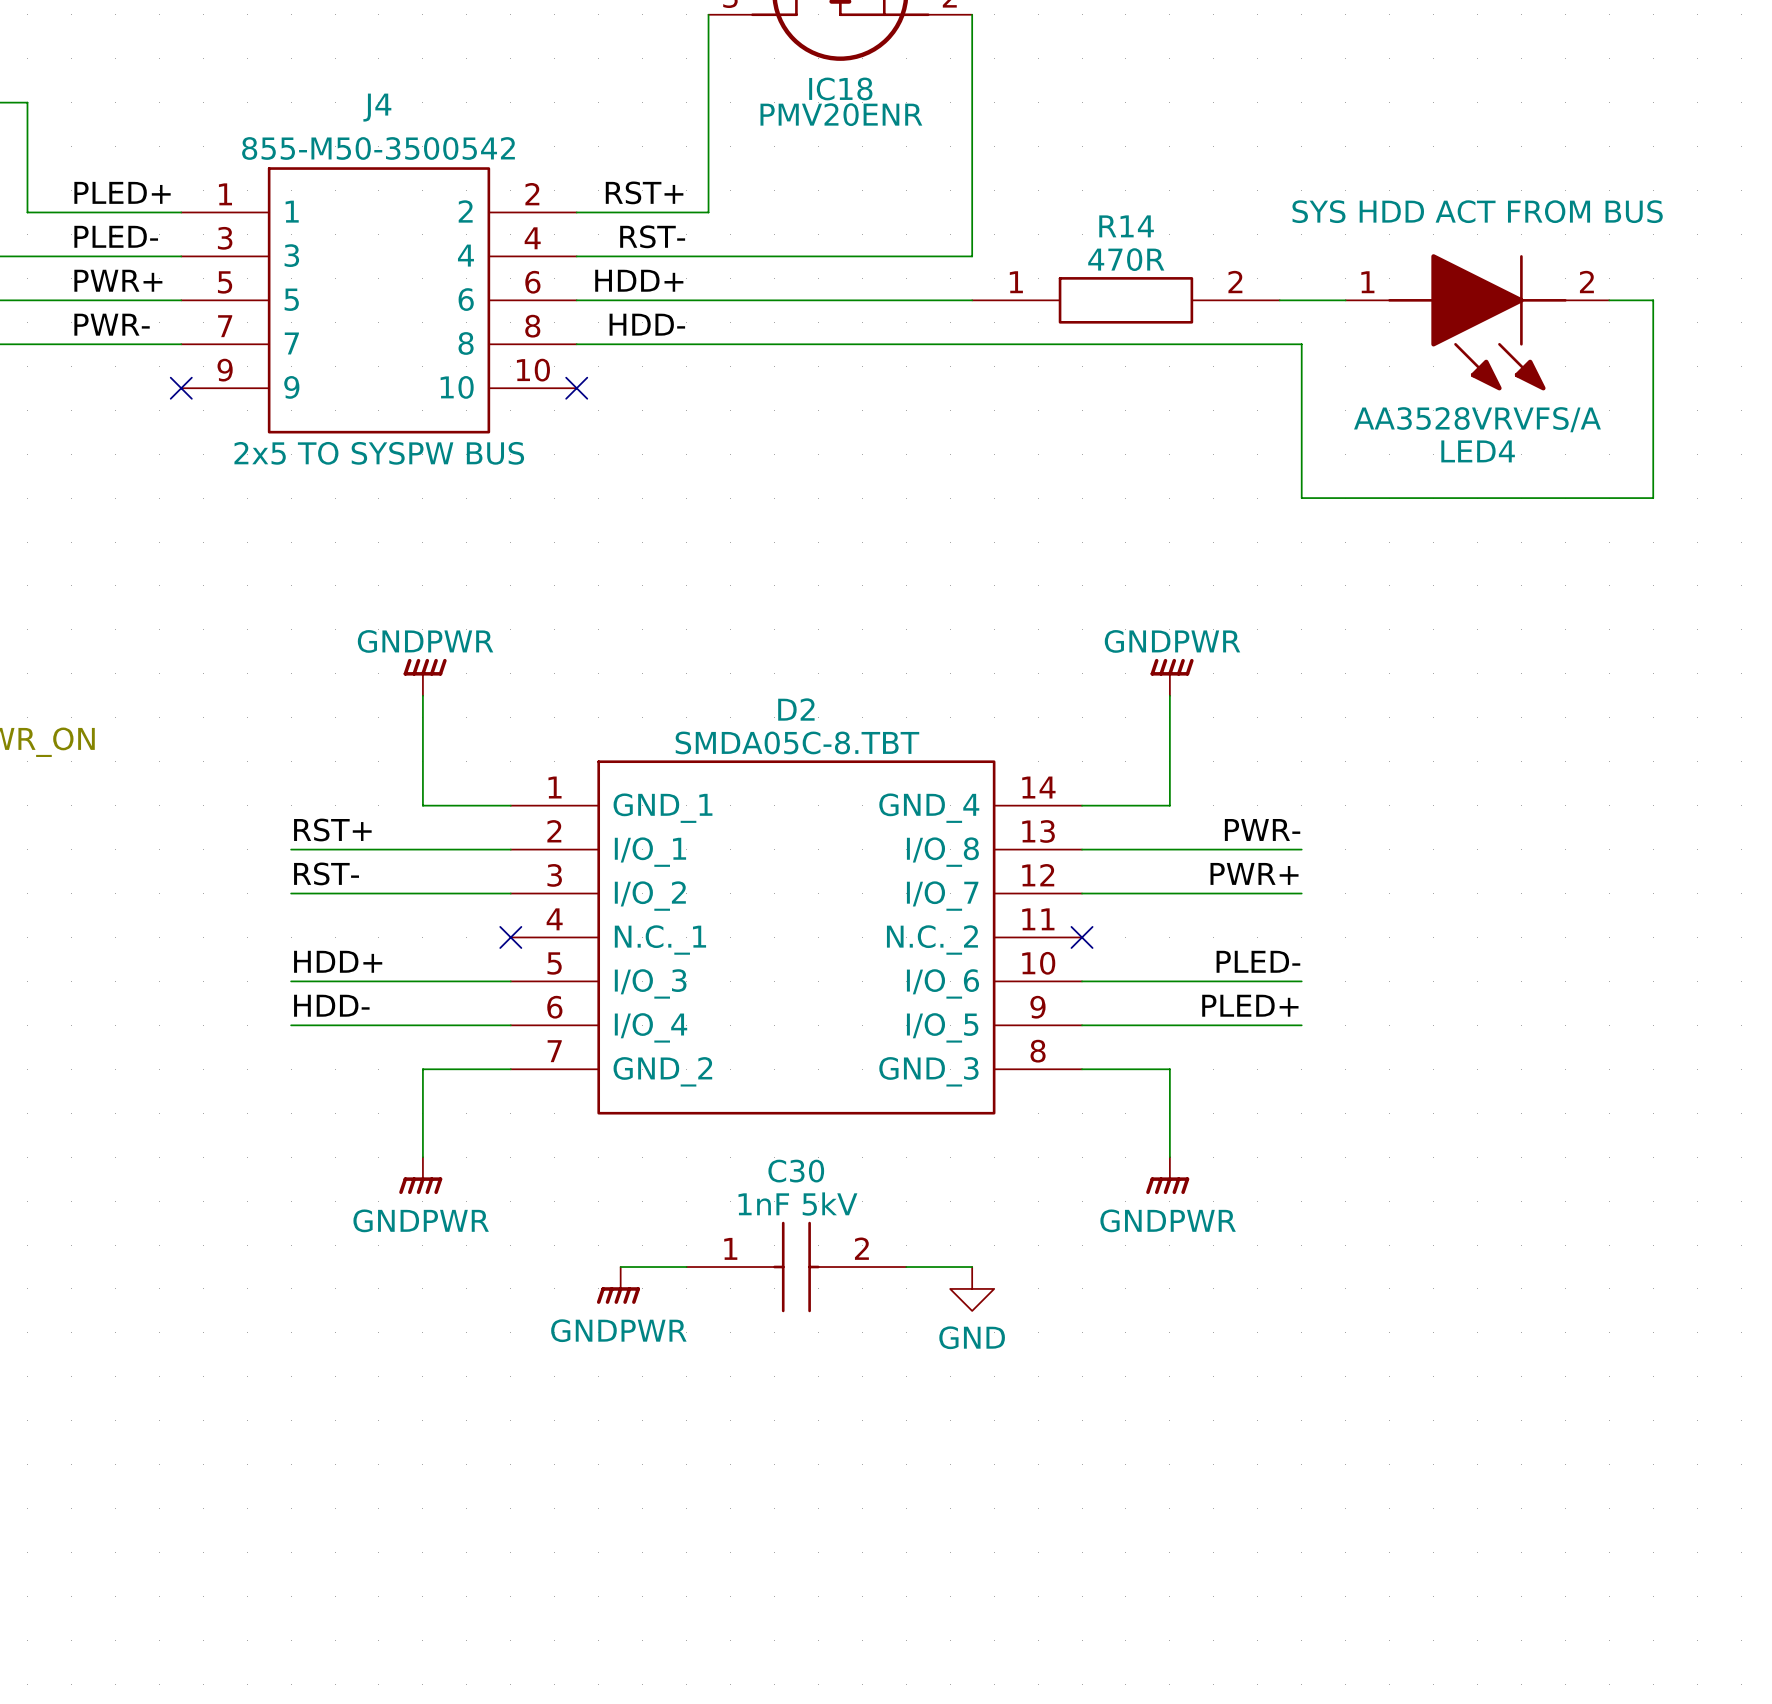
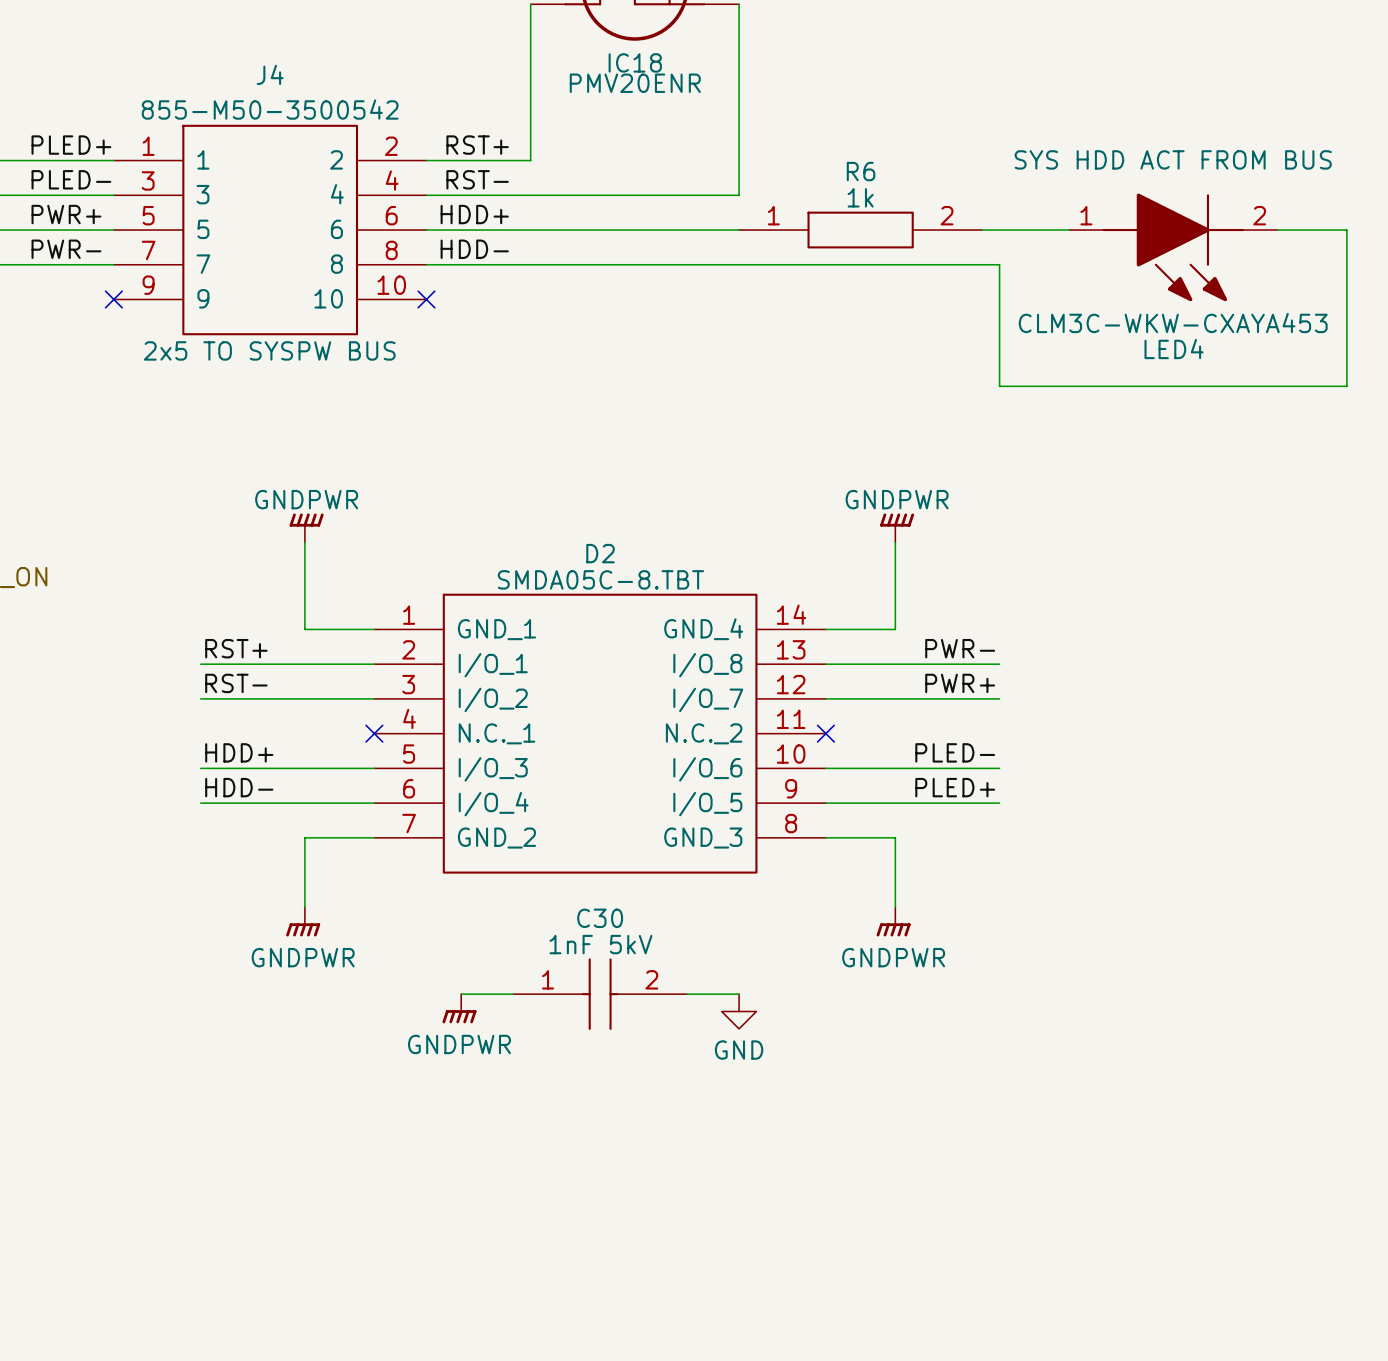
R14 name: R14 (1126, 226) -> R6 (861, 171)
R14 value: 470R (1126, 259) -> 1k (860, 197)
wire: (1609, 300) (1653, 300) (1653, 498) -> (1277, 230) (1346, 230) (1346, 386) (1277, 386)
LED4 position: (1477, 322) -> (1173, 247)
LED4 value: AA3528VRVFS/A (1477, 419) -> CLM3C-WKW-CXAYA453 (1173, 323)

